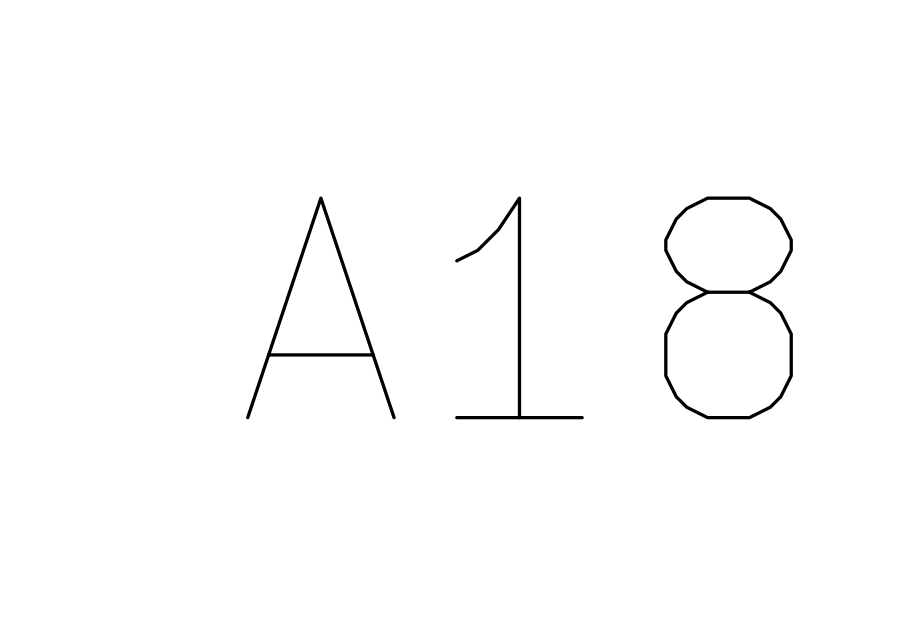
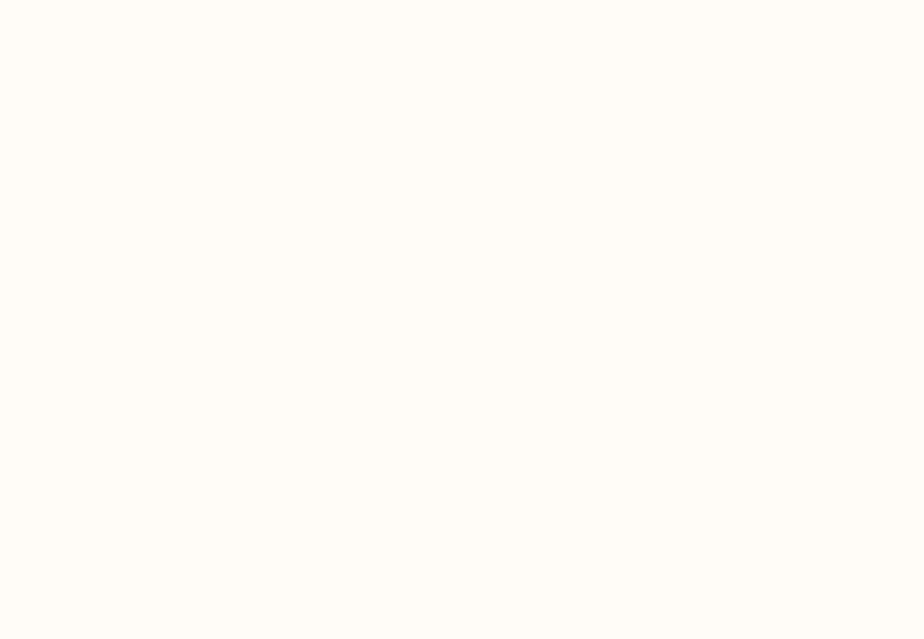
text: A18 (519, 307) -> none

